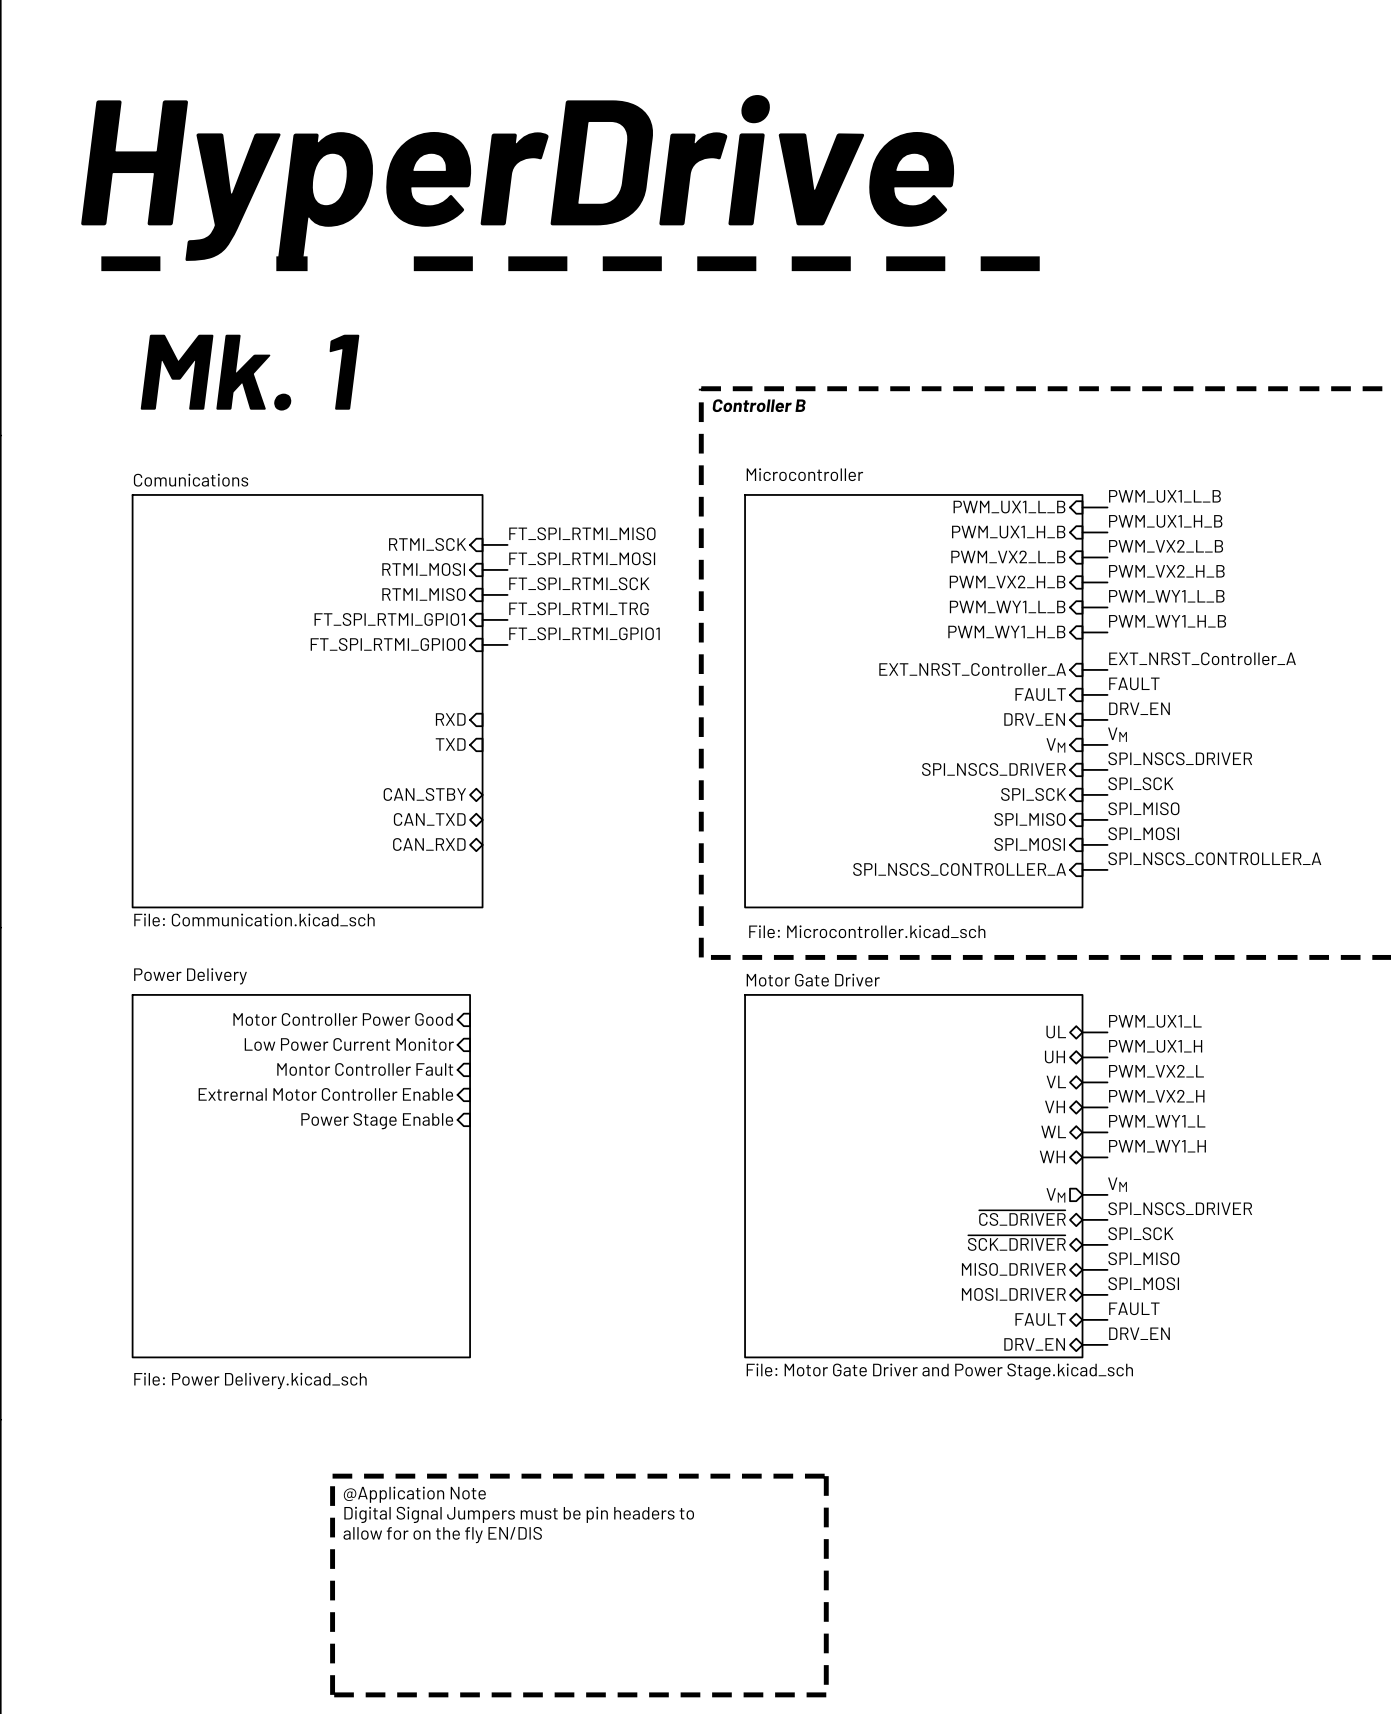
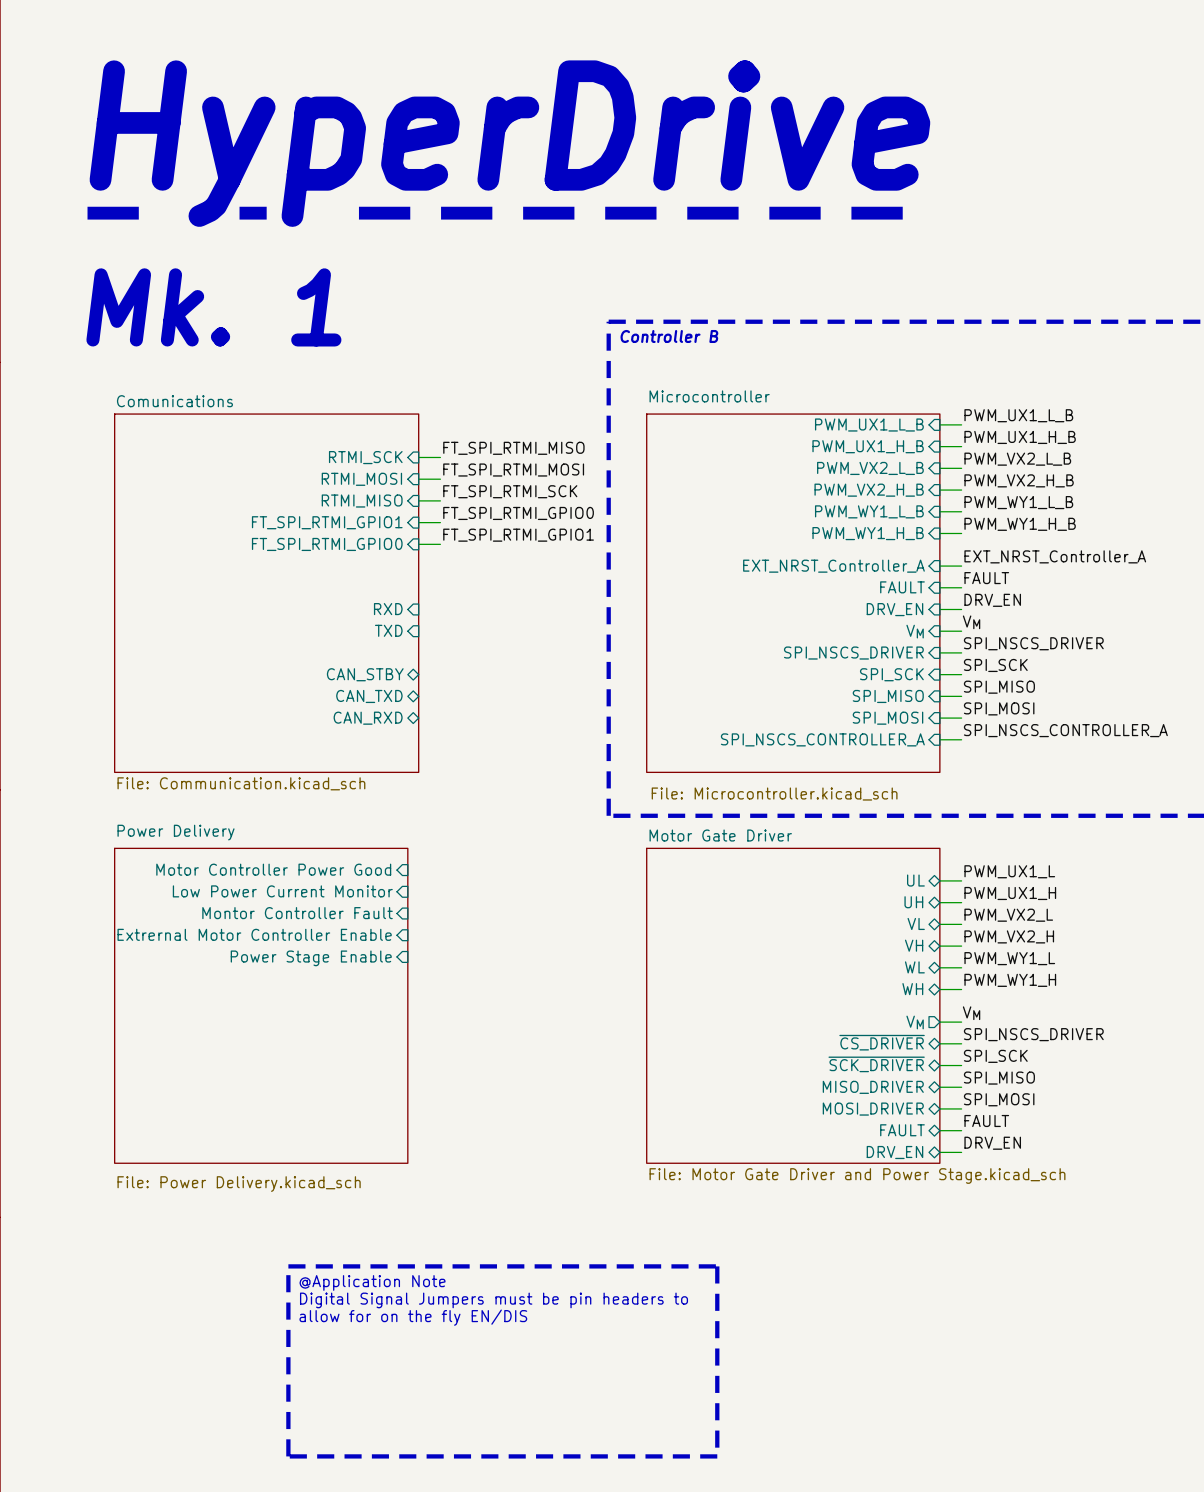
label: FT_SPI_RTMI_TRG (578, 608) -> FT_SPI_RTMI_GPIO0 (518, 513)

